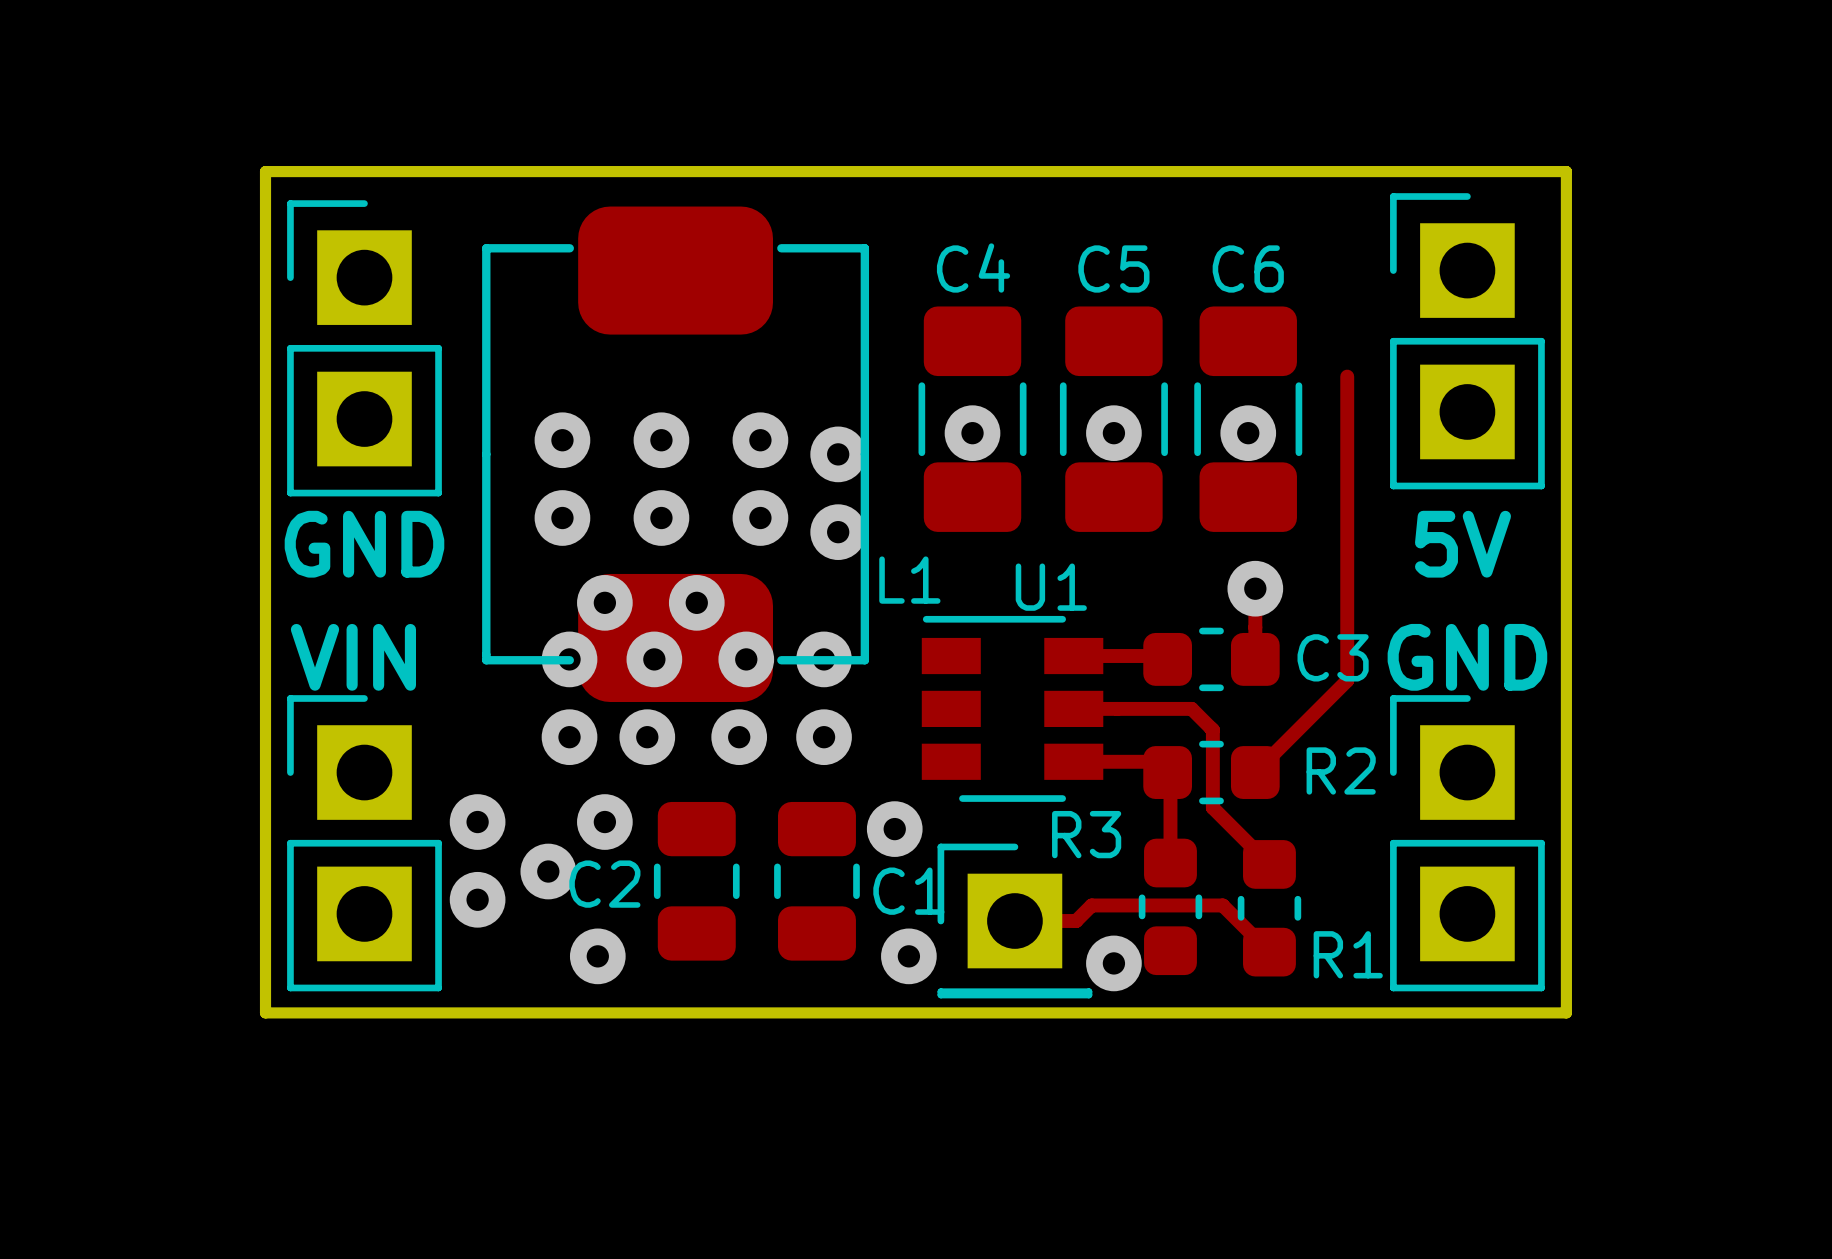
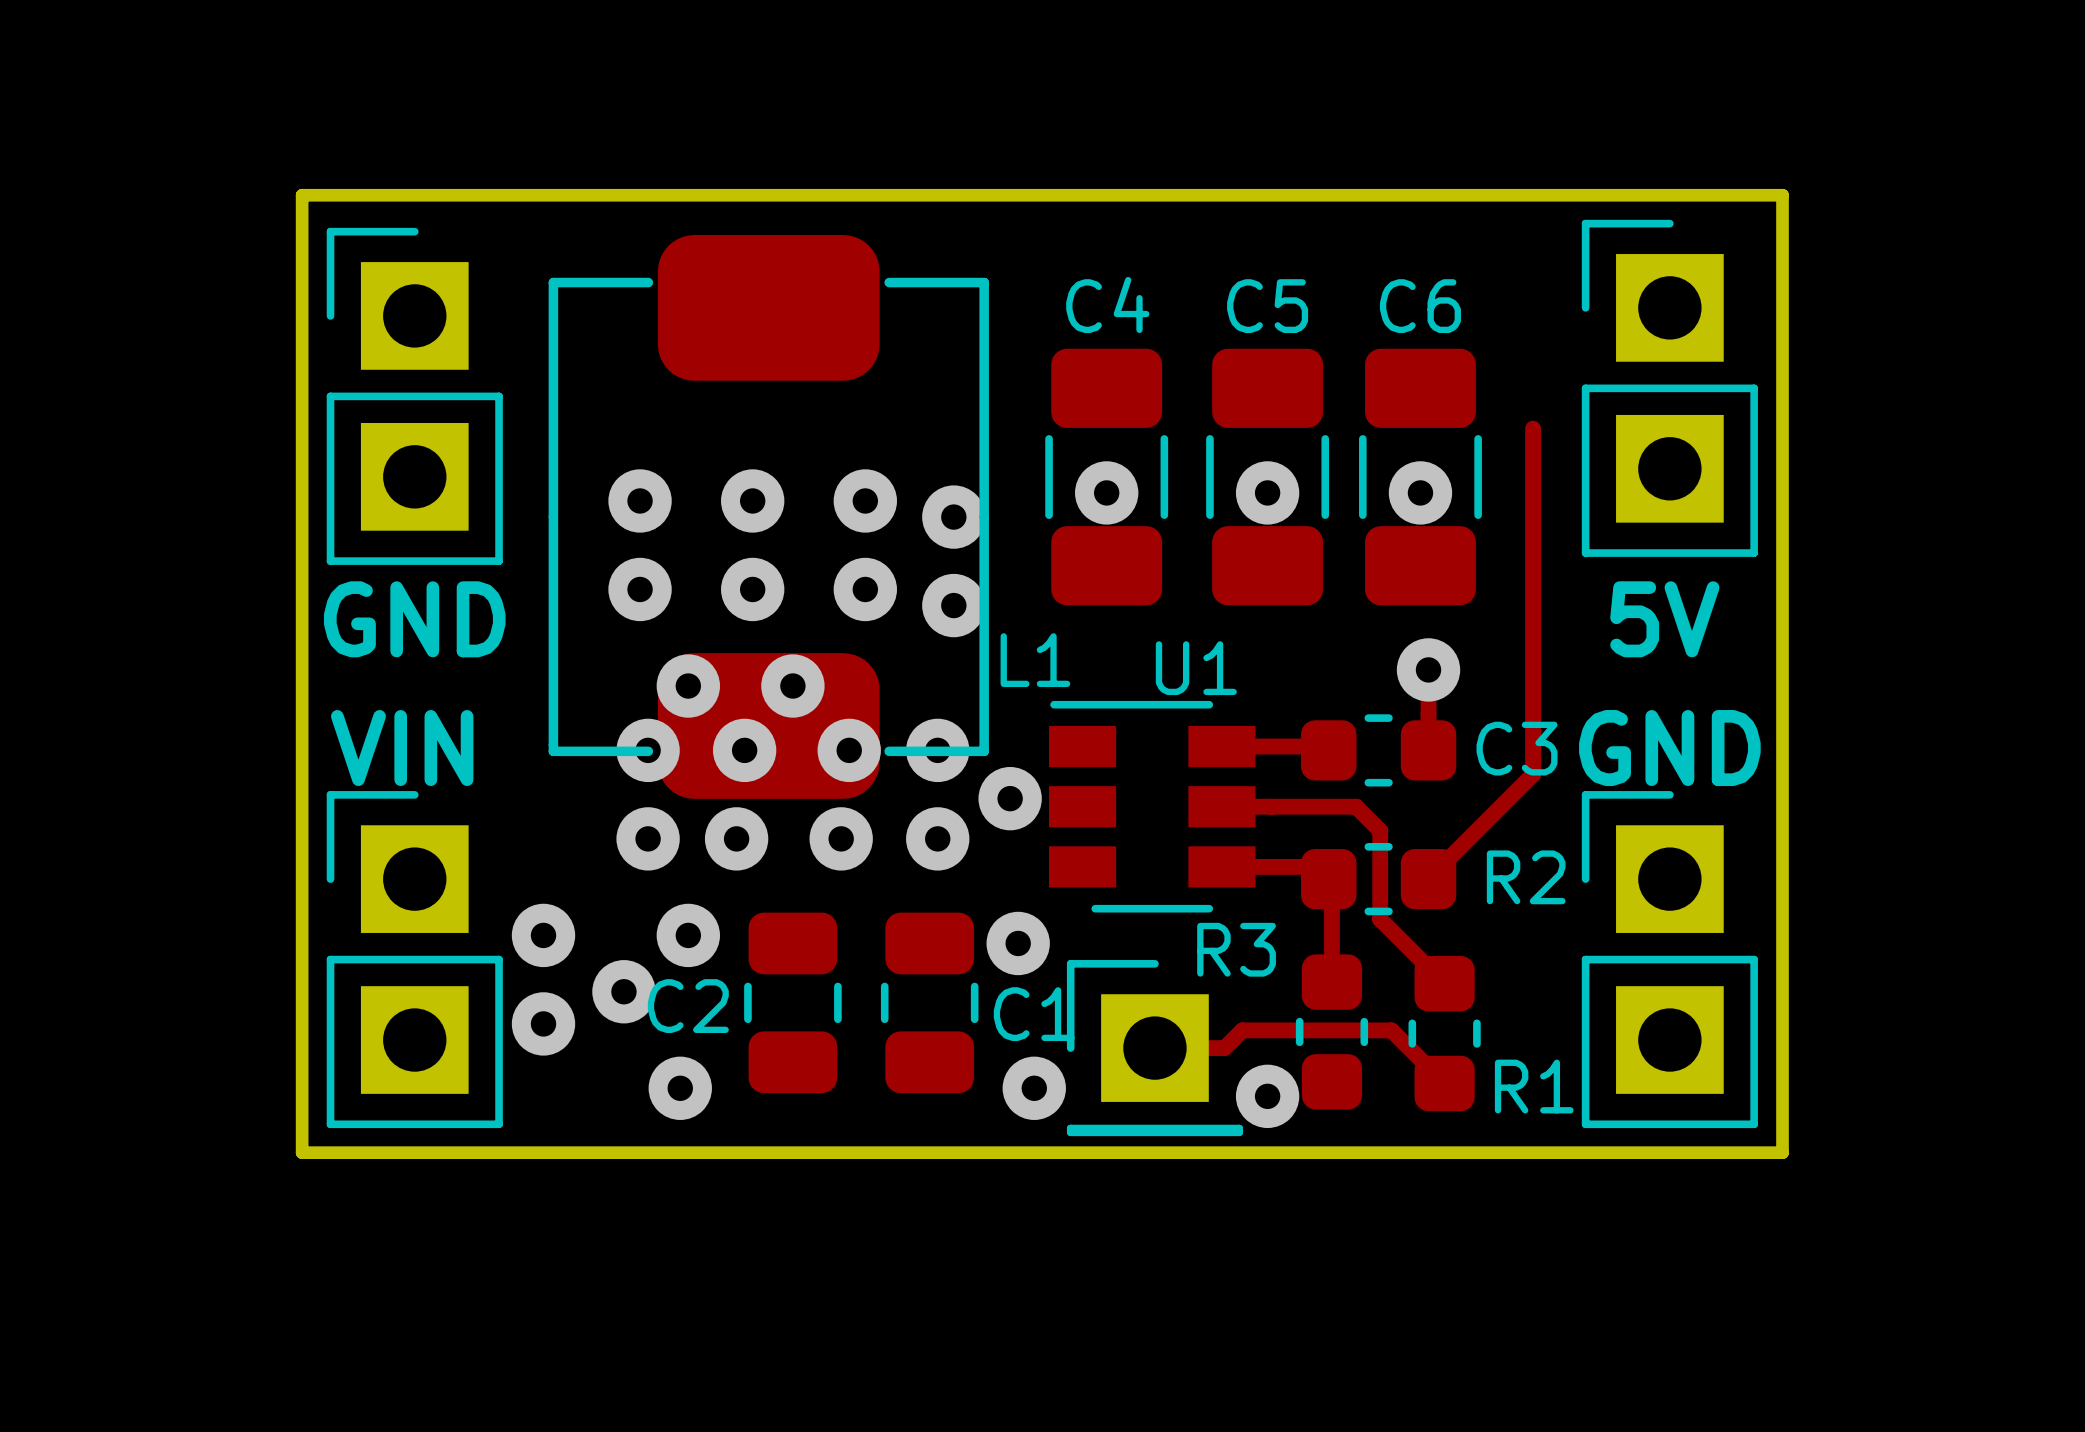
via: none -> (1010, 798)

